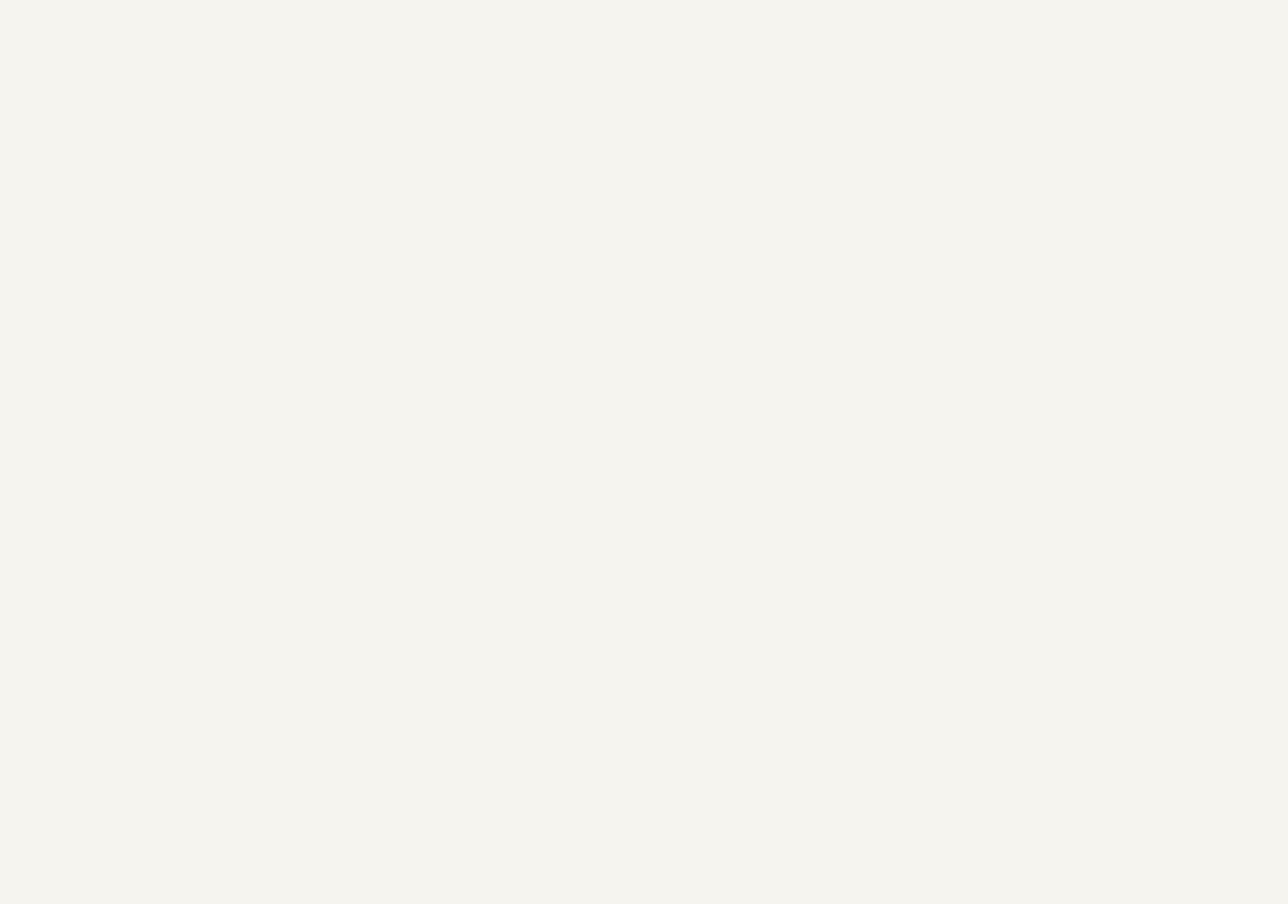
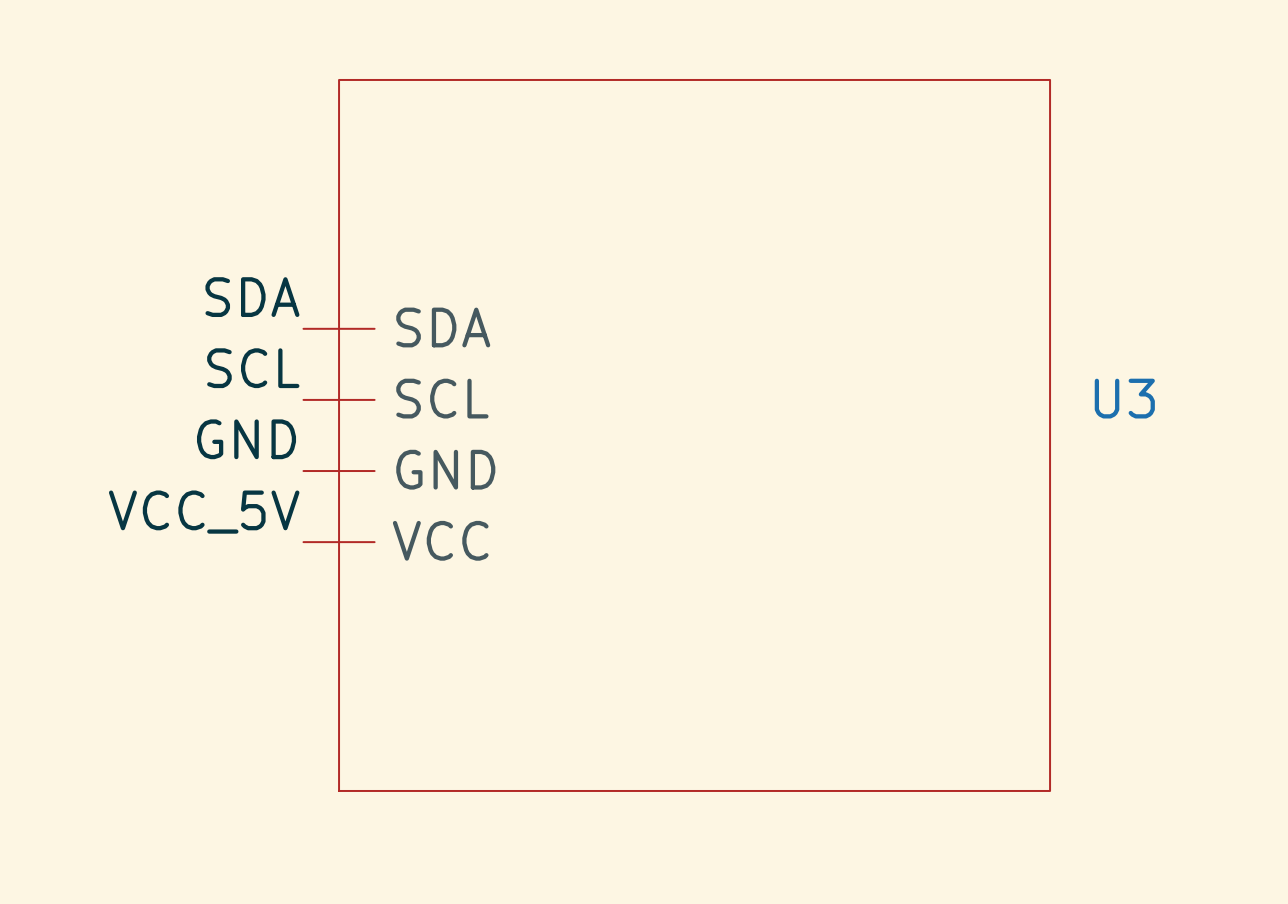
label: none -> SDA (252, 297)
label: none -> SCL (253, 368)
U3: none -> (676, 435)
label: none -> GND (246, 439)
label: none -> VCC_5V (204, 512)

